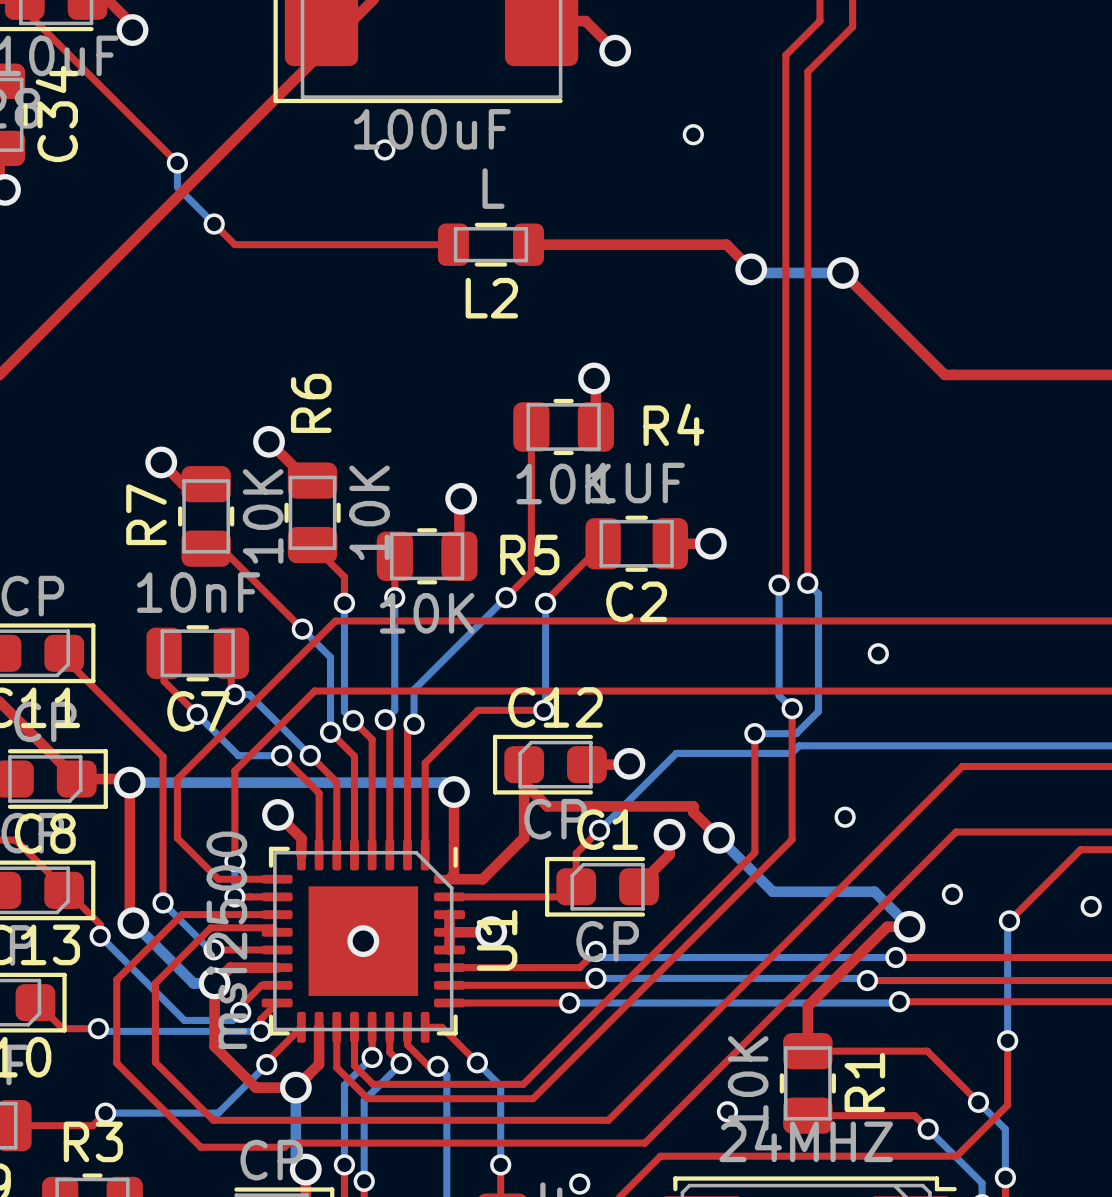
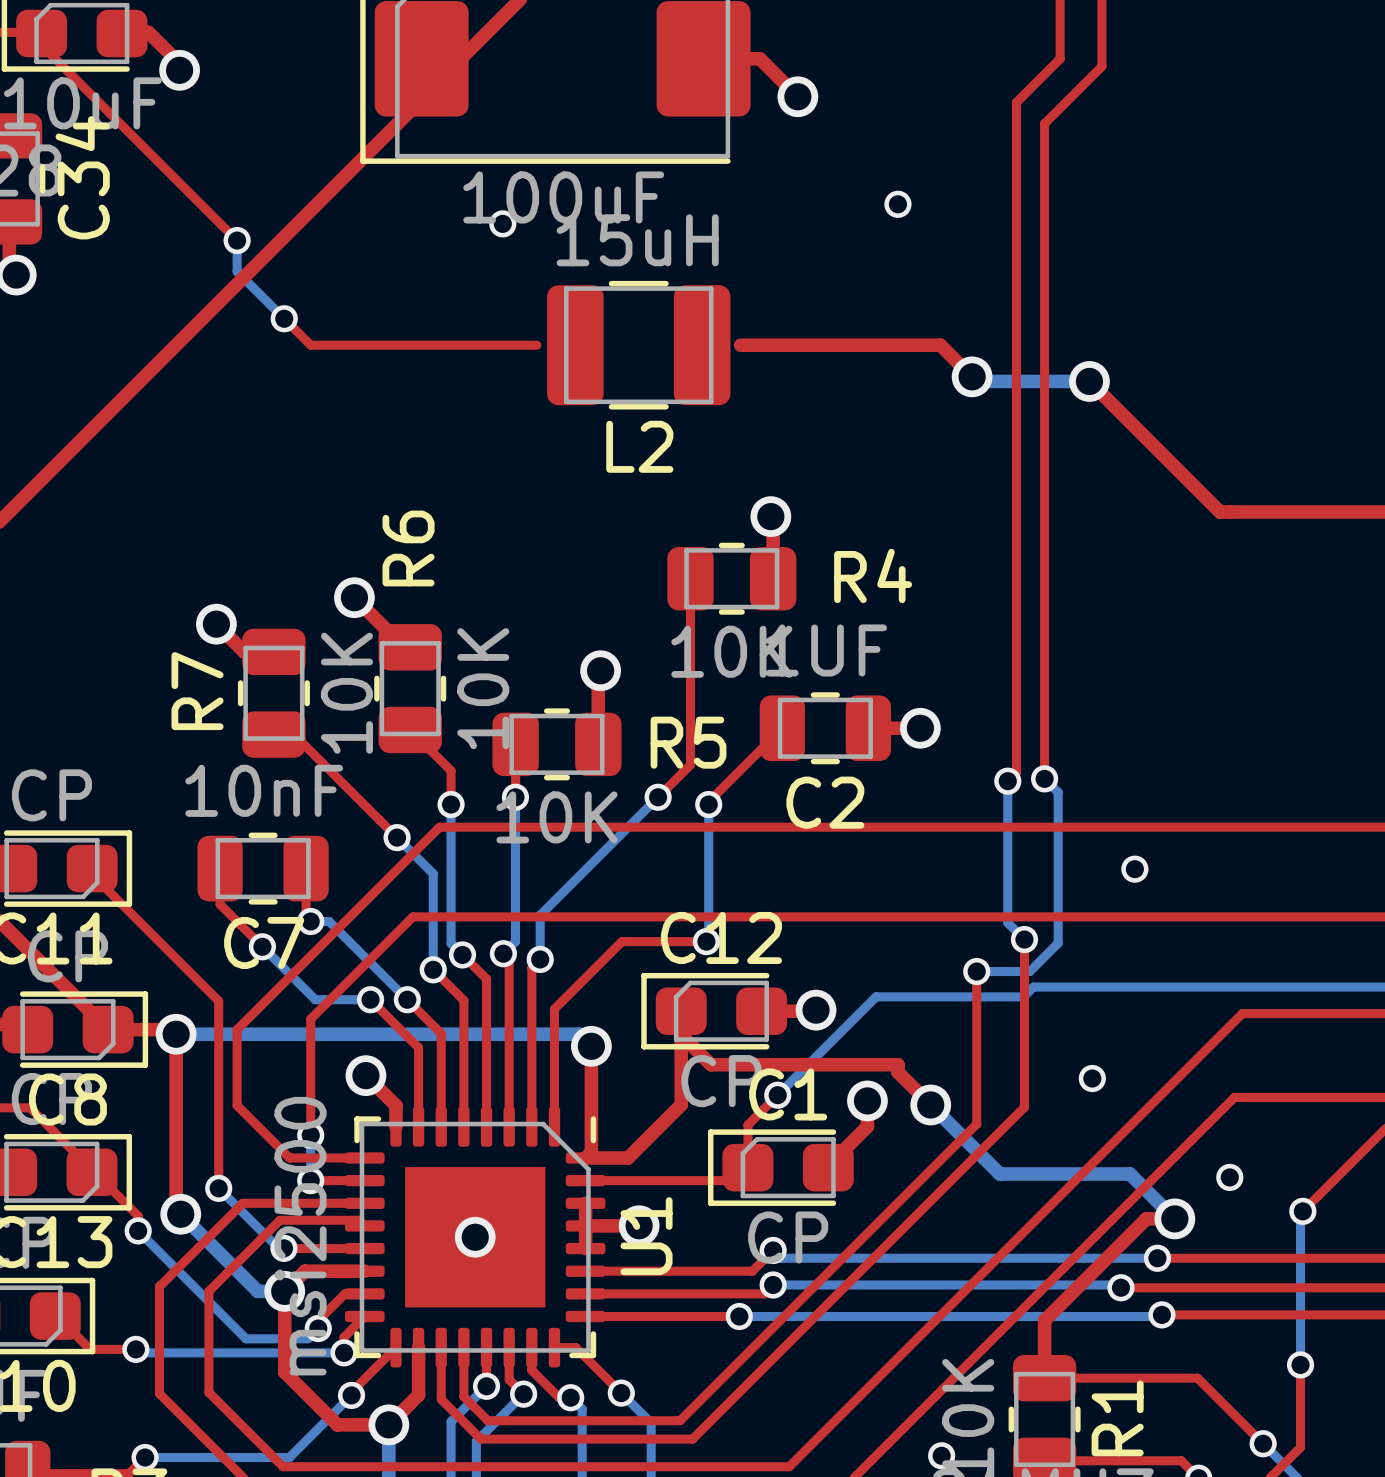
L2 value: L (493, 188) -> 15uH (637, 240)
L2 footprint: [437, 222, 545, 267] -> [547, 280, 731, 410]
top track: (411, 244) (453, 244) -> none
top track: (528, 244) (570, 244) -> none

